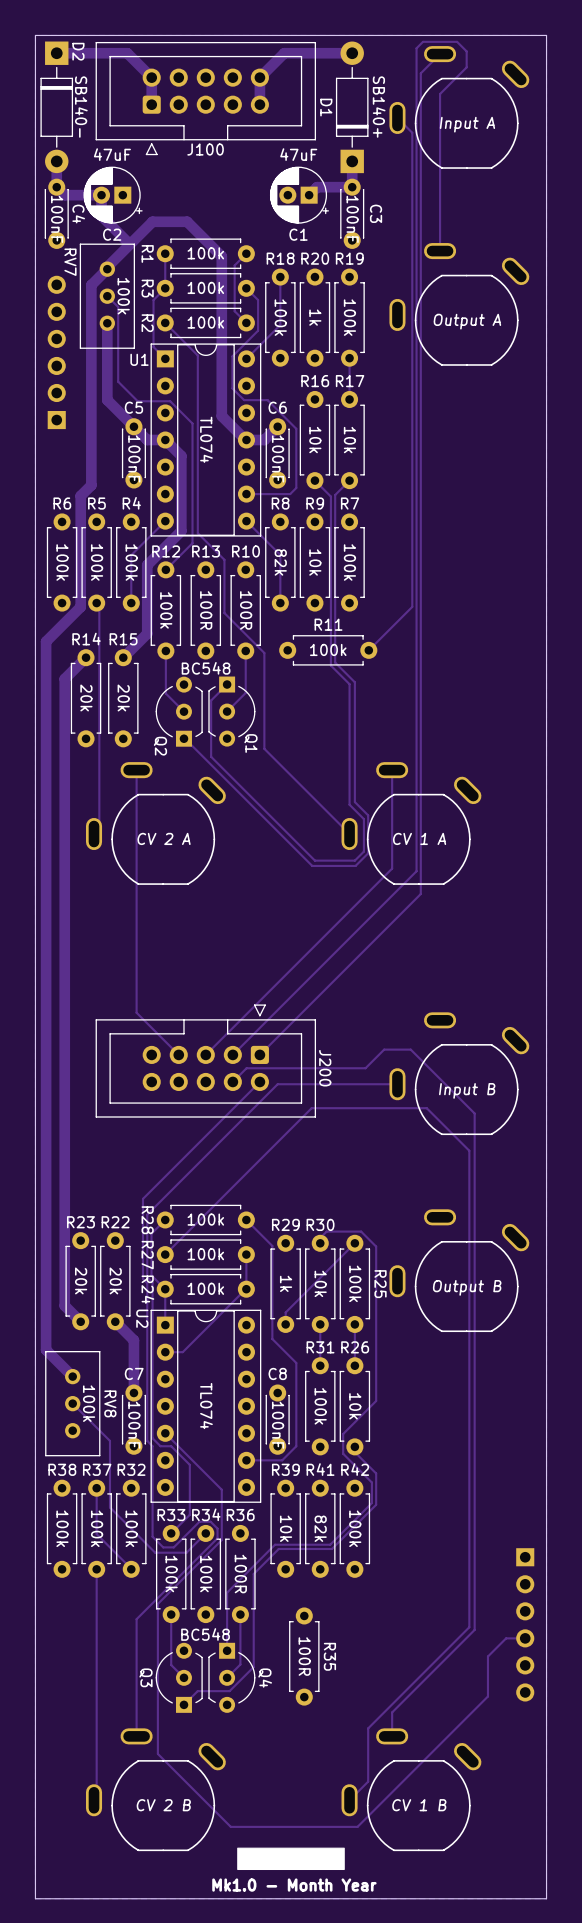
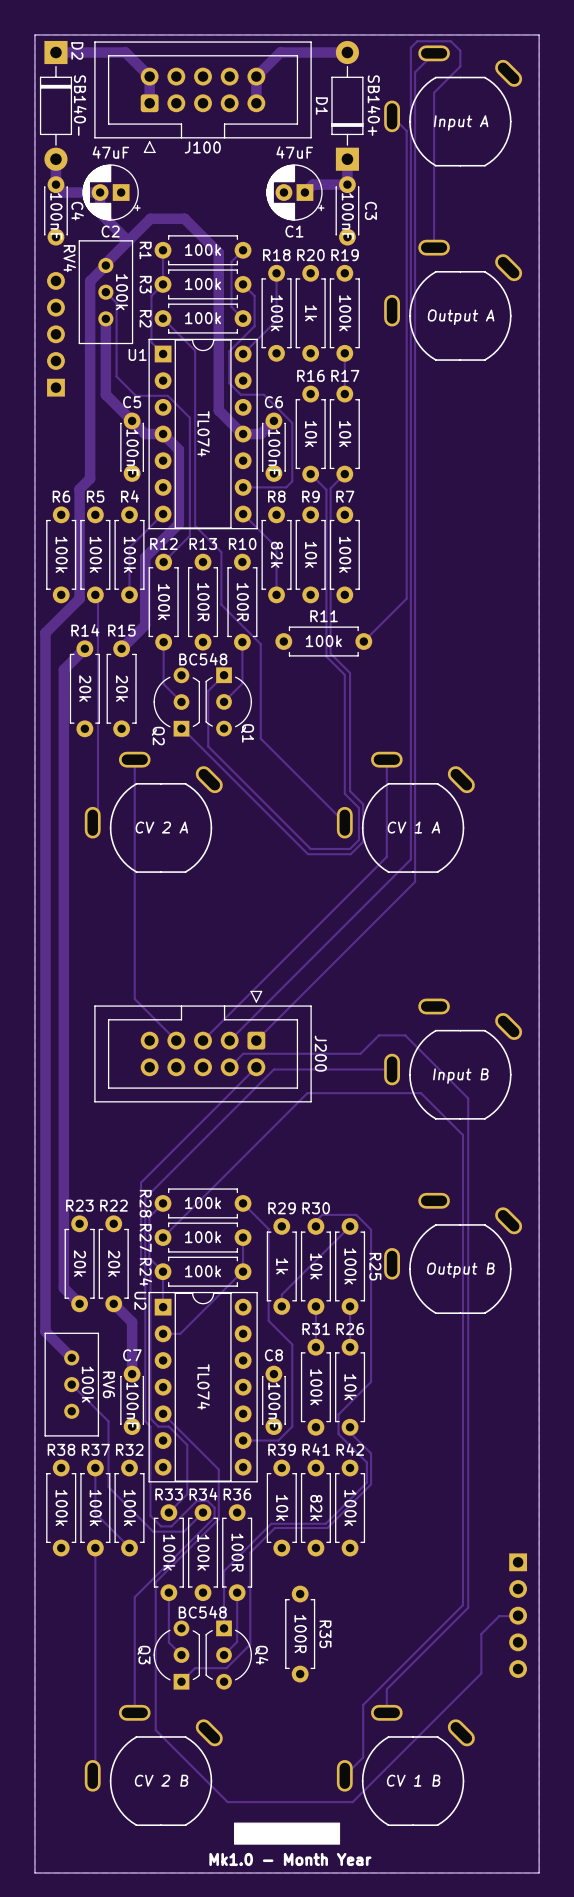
RV7 name: RV7 (70, 262) -> RV4 (69, 258)
part: none -> (55, 334)
part: (56, 352) -> none
RV8 name: RV8 (110, 1403) -> RV6 (108, 1384)
part: (525, 1624) -> none
part: none -> (518, 1615)

